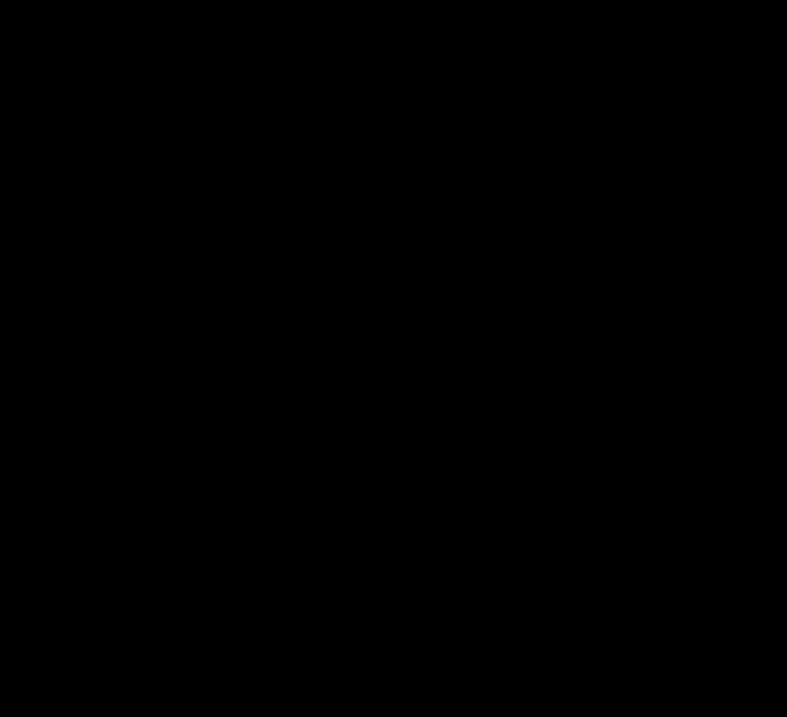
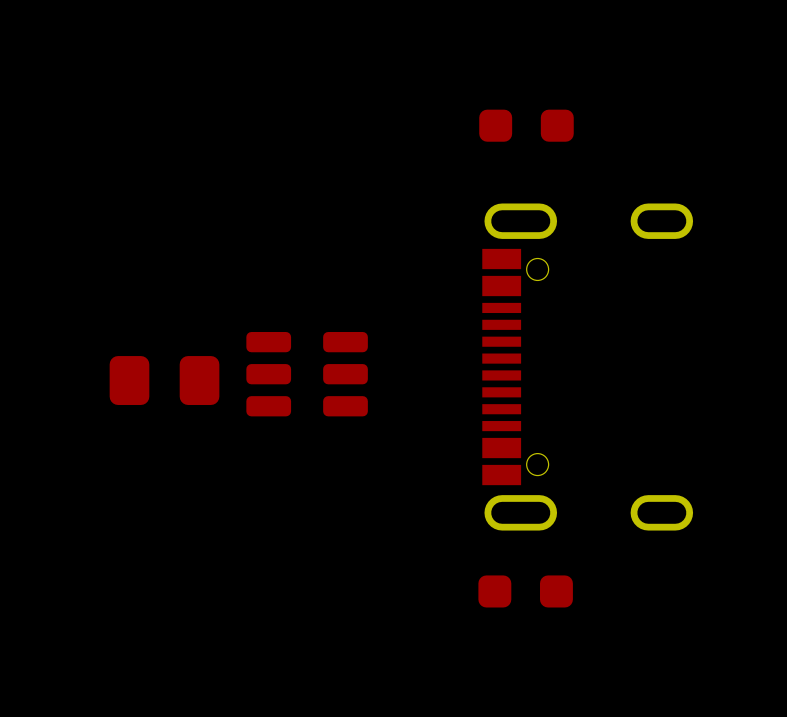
part: none -> (526, 125)
part: none -> (587, 367)
part: none -> (307, 374)
part: none -> (164, 380)
part: none -> (525, 591)

